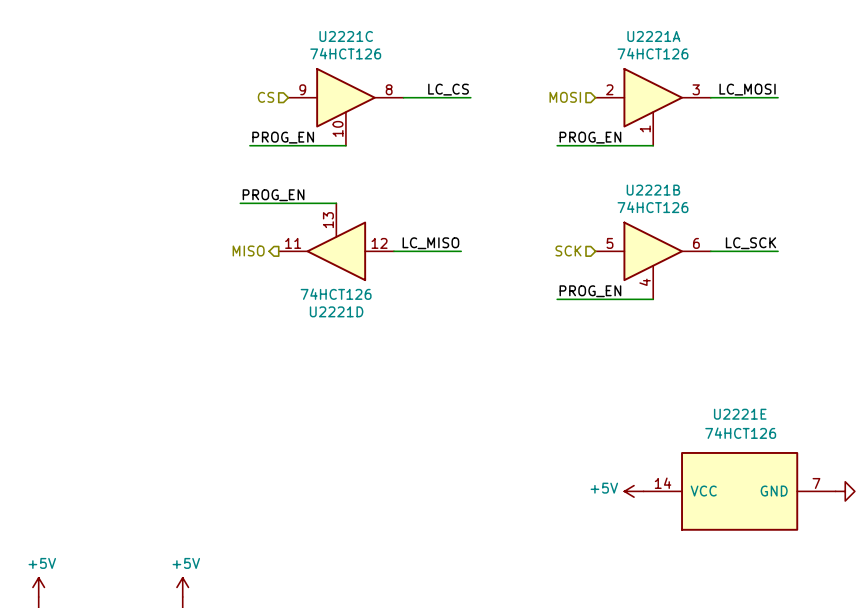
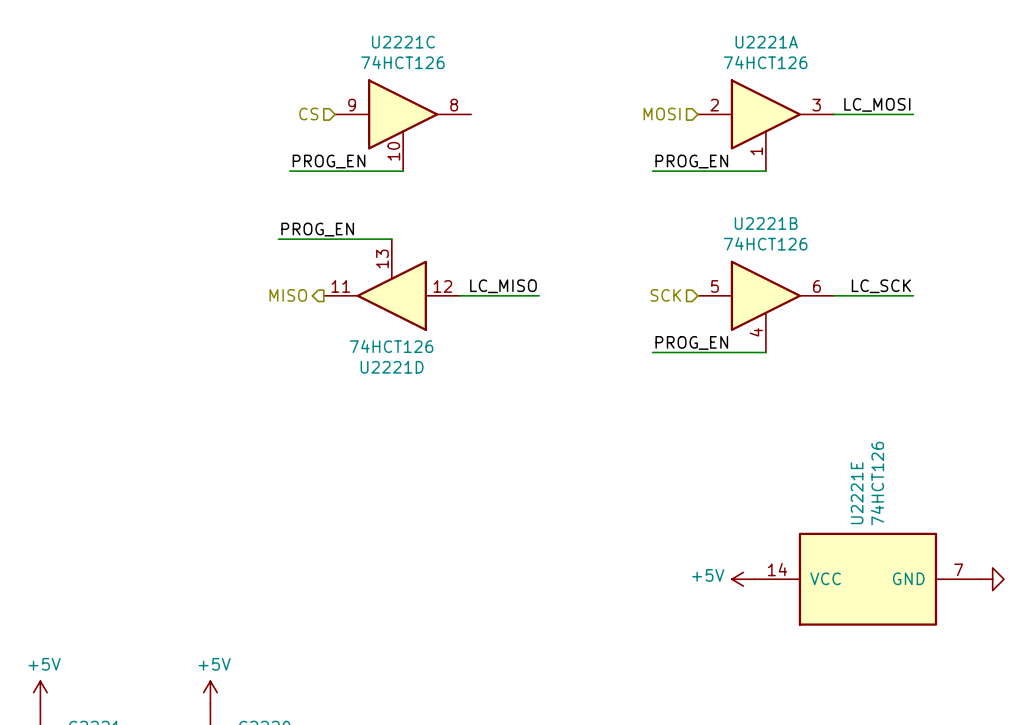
label: LC_CS (448, 89) -> none
wire: (403, 97) (470, 97) -> none
U2221E name rotation: 0° (740, 414) -> 90° counterclockwise (857, 493)
U2221E value rotation: 0° (740, 433) -> 90° counterclockwise (877, 483)

